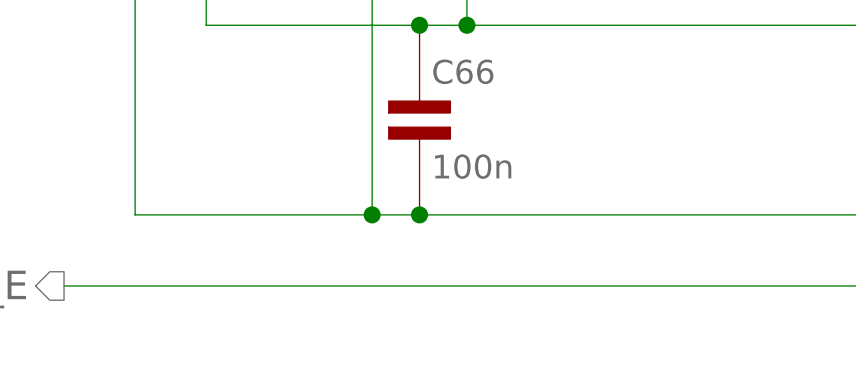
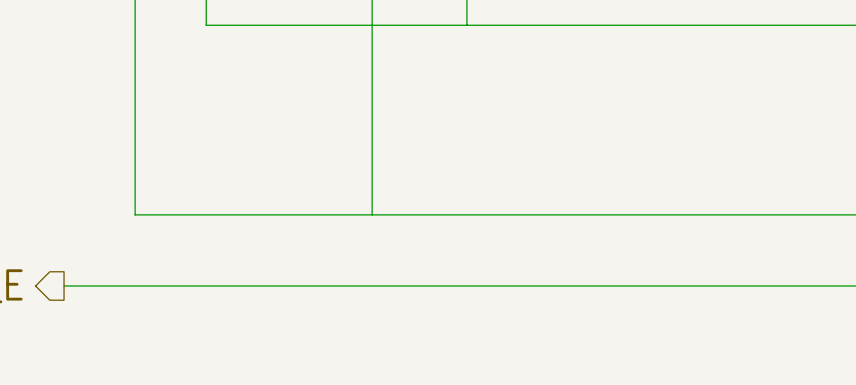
junction: (419, 25) -> none
junction: (466, 25) -> none
C66: 100n (419, 120) -> none
junction: (372, 214) -> none
junction: (419, 214) -> none

